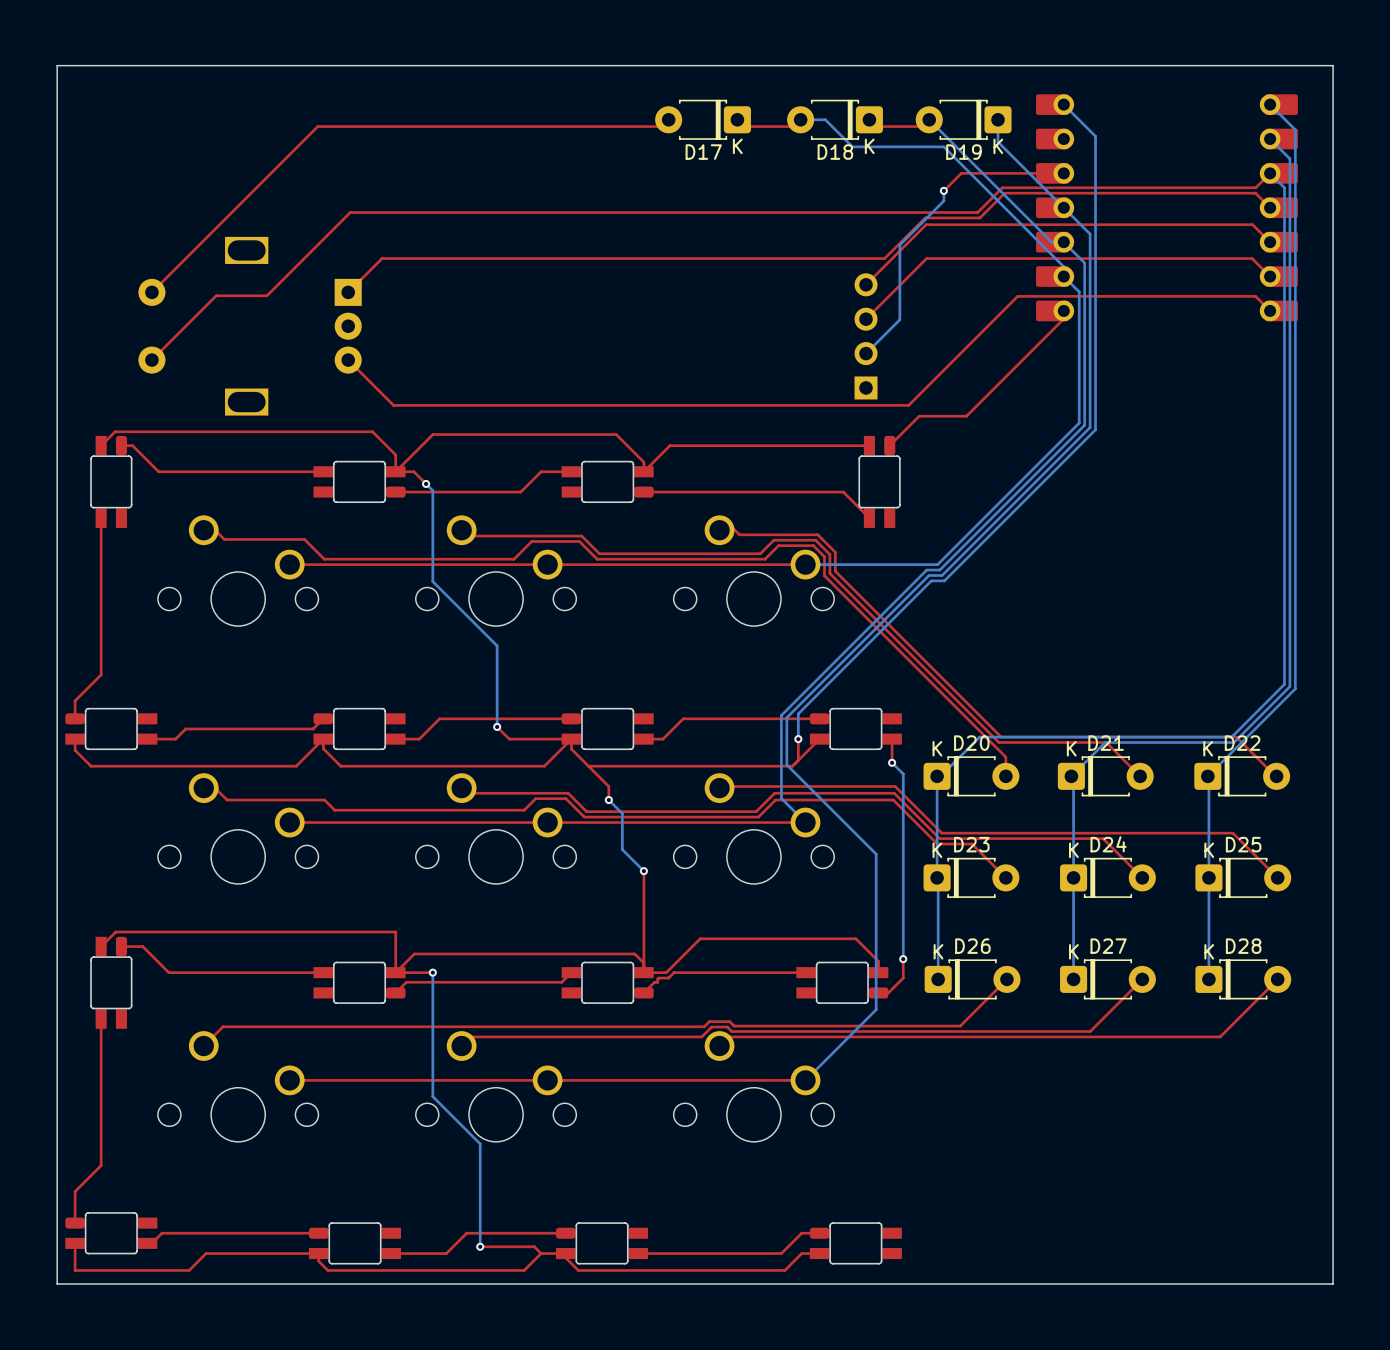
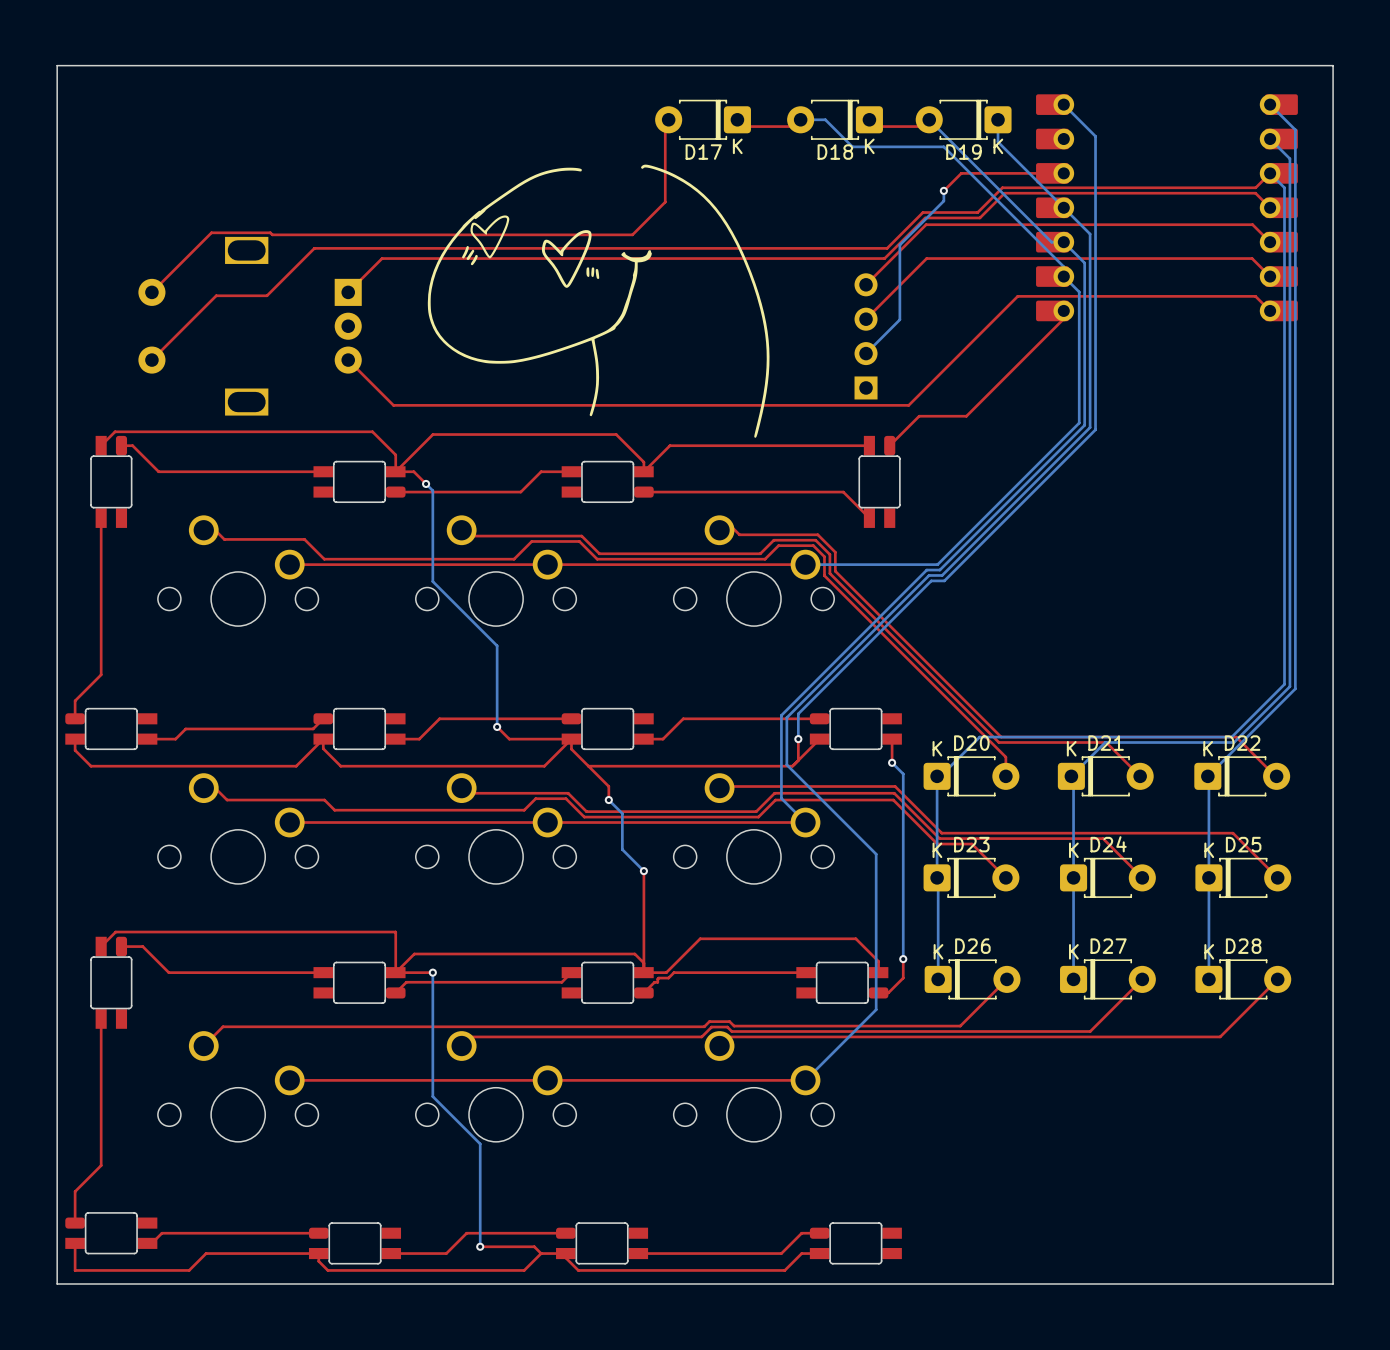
top track: (665, 126) (317, 126) (211, 232) -> (665, 126) (665, 202) (632, 234) (272, 234) (270, 232) (211, 232)
drawing: none -> [427, 164, 770, 438]
top track: (922, 212) (350, 212) (314, 248) -> (922, 212) (887, 248) (314, 248)

